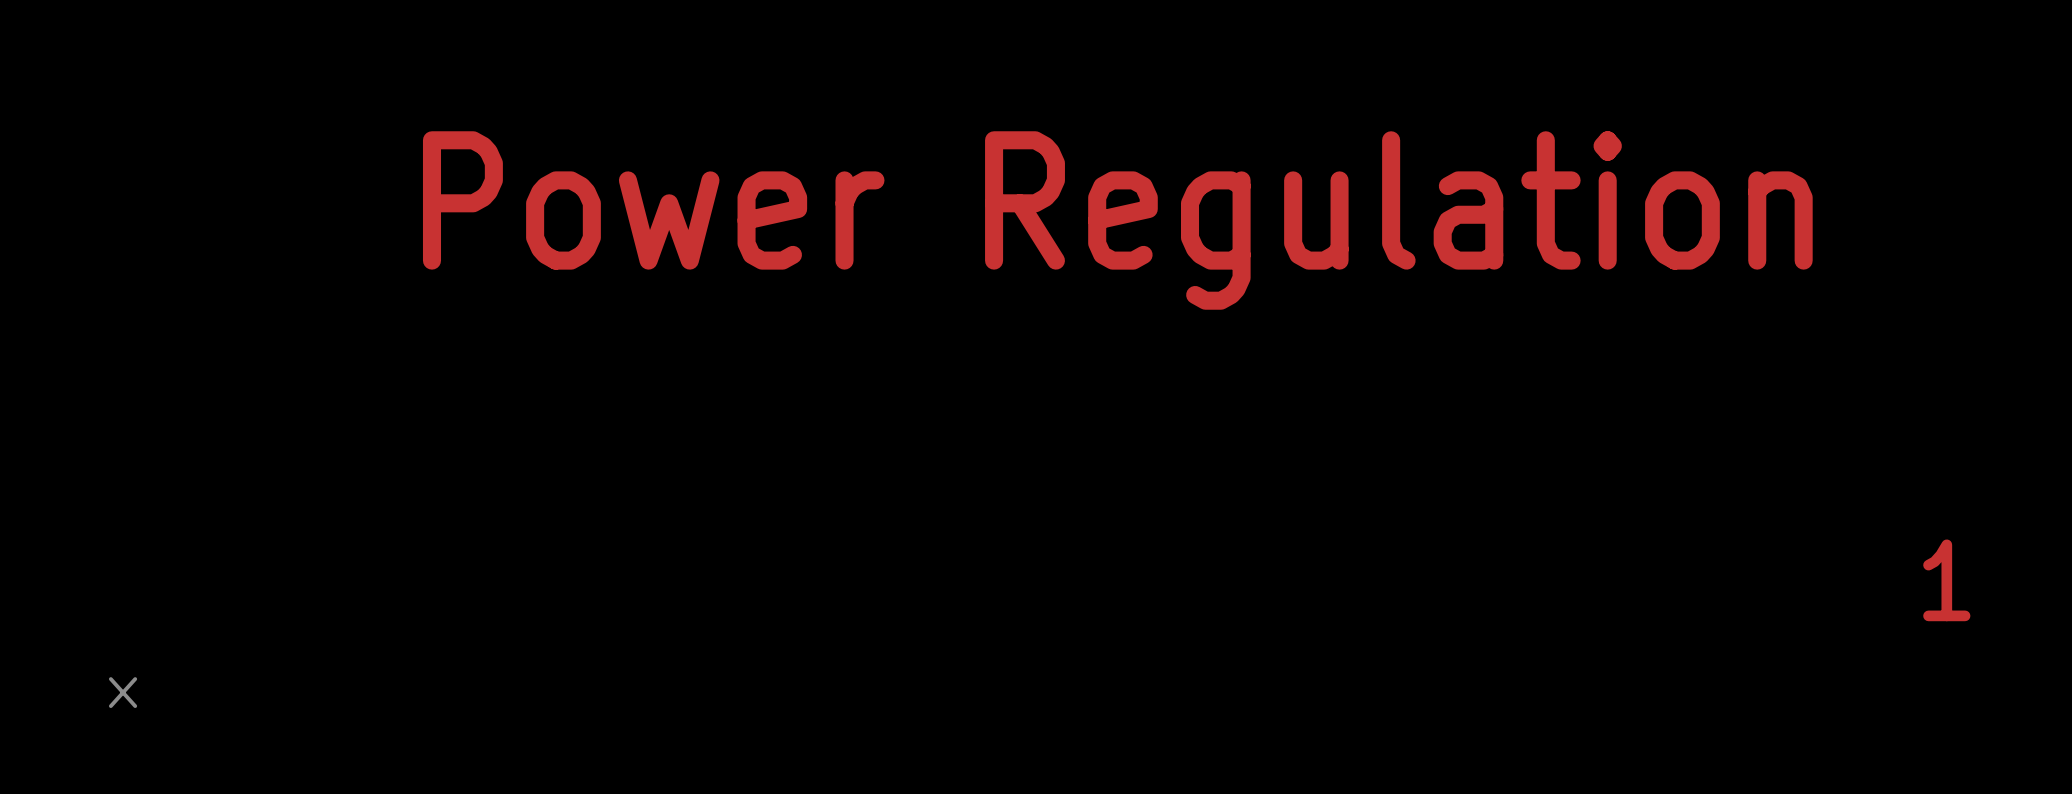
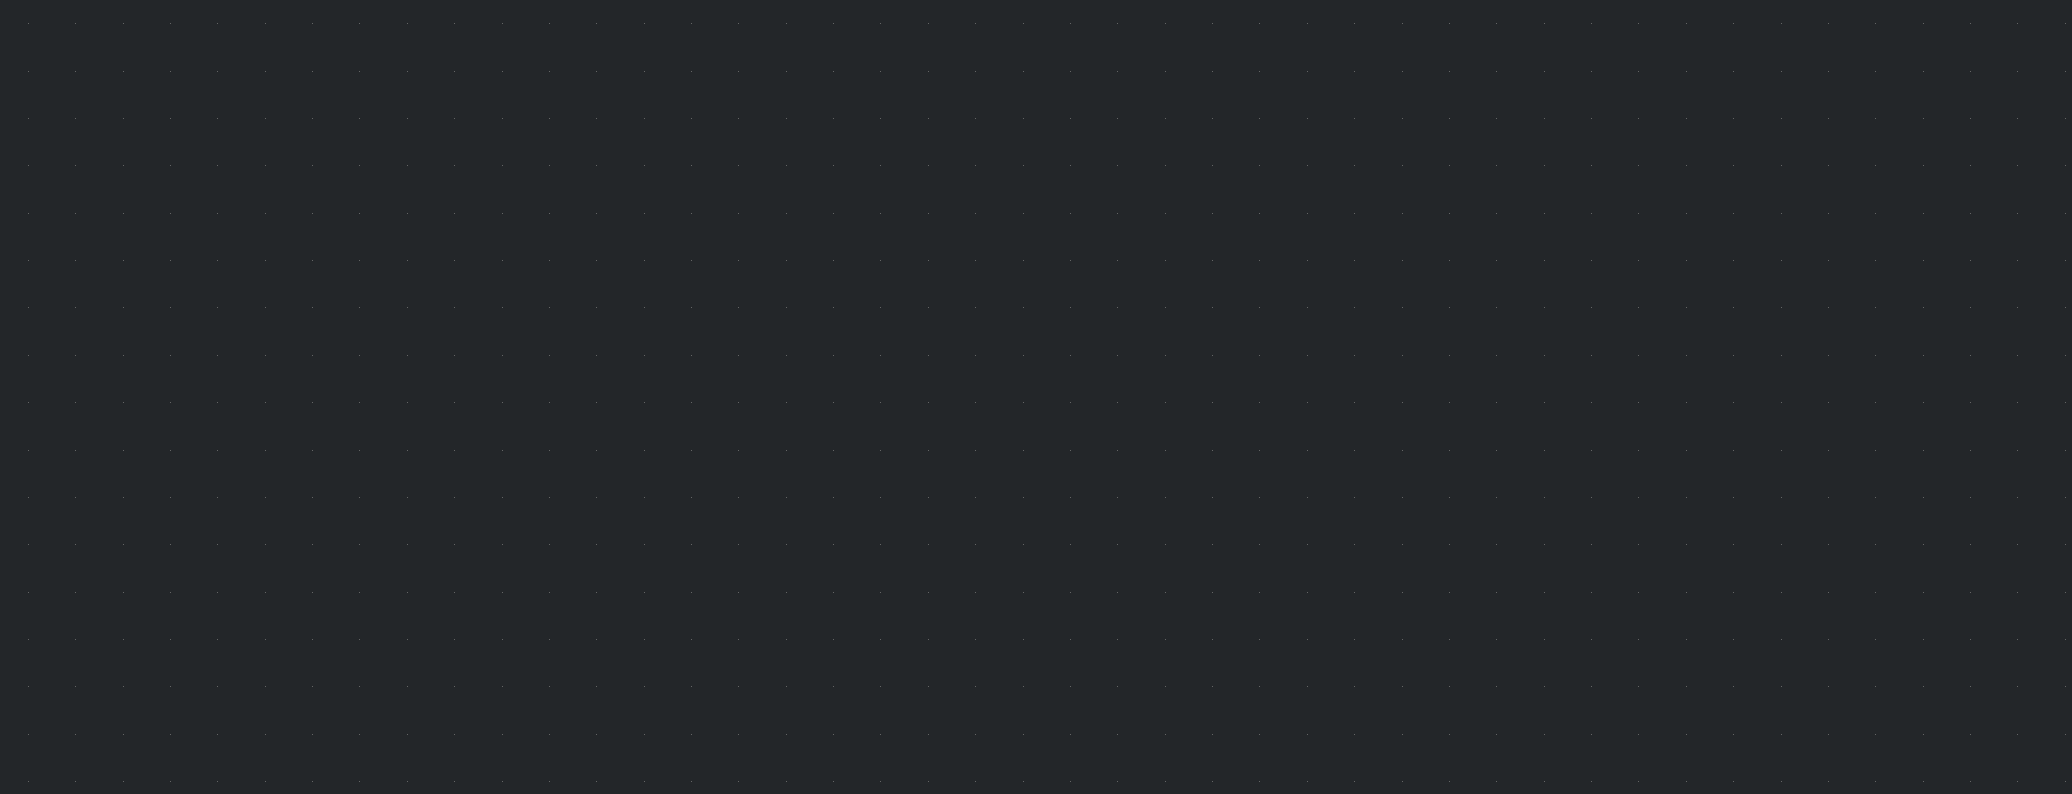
text: Power Regulation (1117, 220) -> none
text: 1 (1946, 580) -> none
text: × (123, 692) -> none

